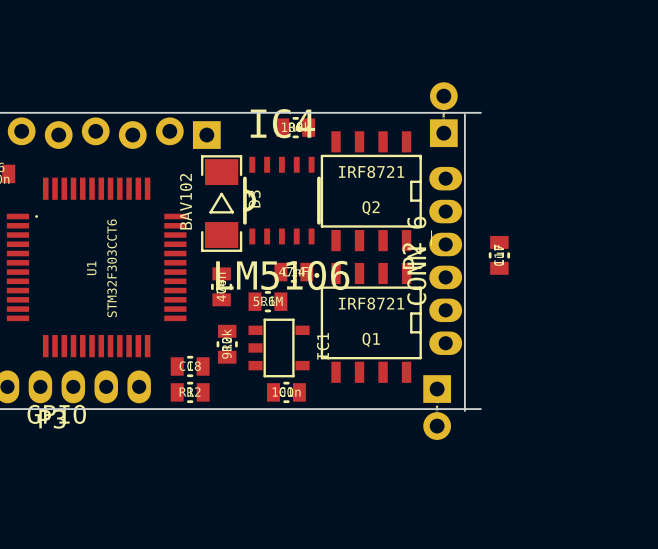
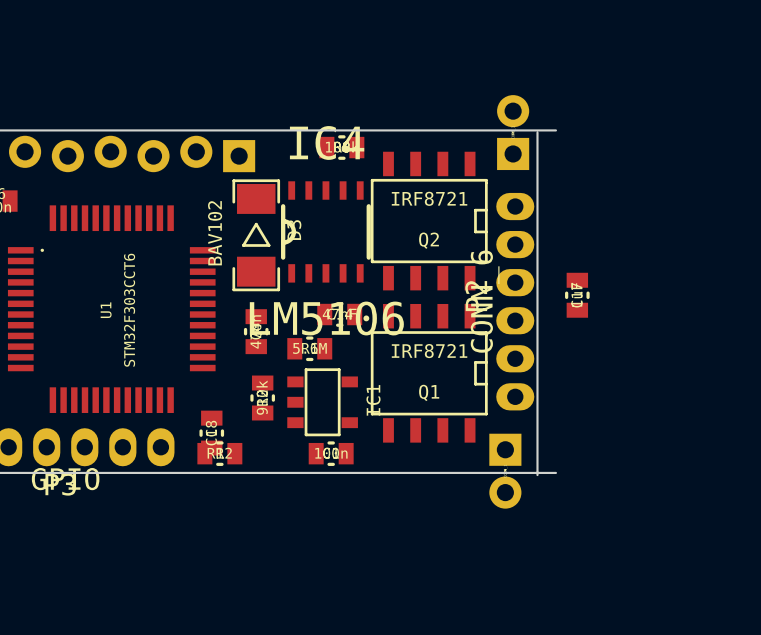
C18 rotation: 0° (190, 366) -> 90° clockwise (211, 433)

